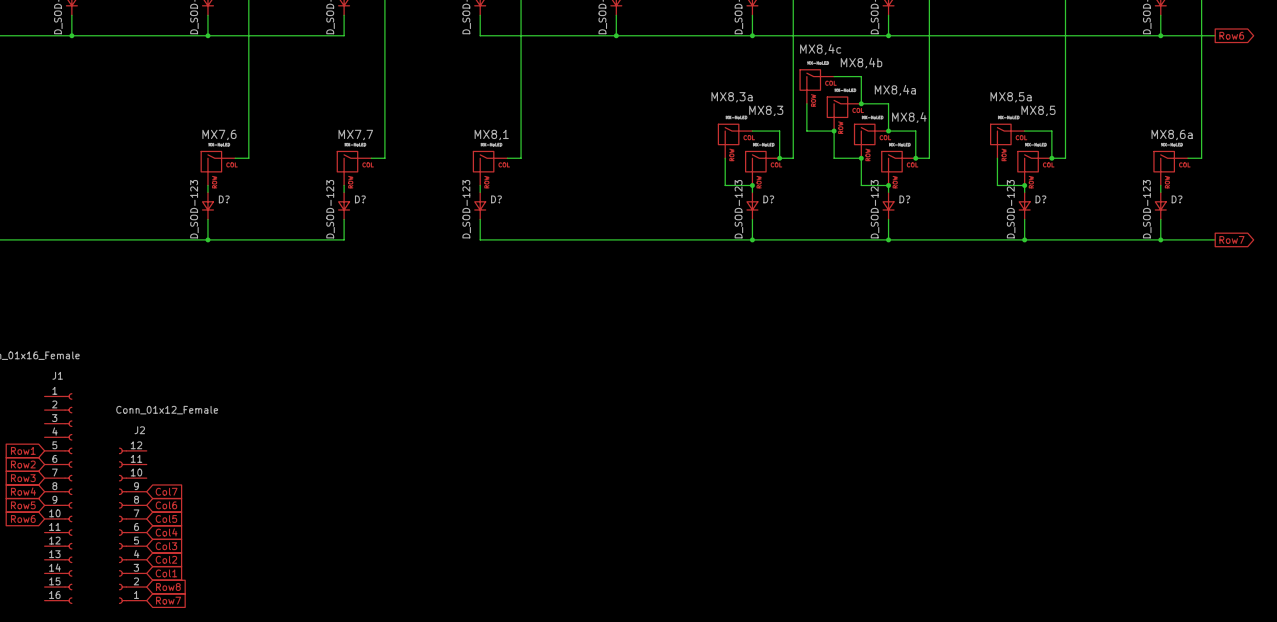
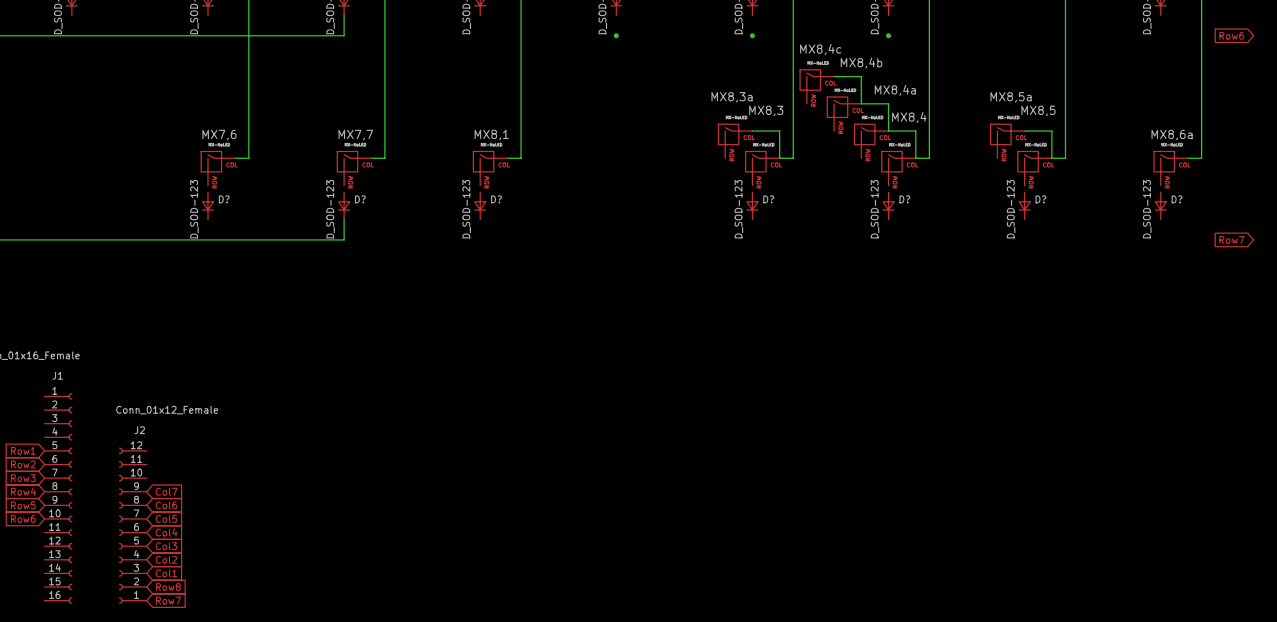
wire: (71, 15) (71, 35) -> none
wire: (207, 15) (207, 35) -> none
wire: (480, 15) (480, 35) (1215, 35) -> none
wire: (616, 15) (616, 35) -> none
wire: (752, 15) (752, 35) -> none
wire: (888, 15) (888, 35) -> none
wire: (1160, 15) (1160, 35) -> none
junction: (71, 35) -> none
junction: (207, 35) -> none
junction: (1160, 35) -> none
wire: (806, 103) (806, 131) (834, 131) (834, 158) (861, 158) (861, 185) (888, 185) (888, 192) -> none
junction: (861, 103) -> none
junction: (834, 131) -> none
junction: (888, 131) -> none
wire: (725, 158) (725, 185) (752, 185) (752, 192) -> none
junction: (779, 158) -> none
junction: (861, 158) -> none
junction: (915, 158) -> none
wire: (997, 158) (997, 185) (1024, 185) (1024, 192) -> none
junction: (1051, 158) -> none
wire: (207, 185) (207, 192) -> none
wire: (344, 185) (344, 192) -> none
wire: (480, 185) (480, 192) -> none
junction: (752, 185) -> none
junction: (888, 185) -> none
junction: (1024, 185) -> none
wire: (1160, 185) (1160, 192) -> none
wire: (207, 219) (207, 239) -> none
wire: (480, 219) (480, 239) (1215, 239) -> none
wire: (752, 219) (752, 239) -> none
wire: (888, 219) (888, 239) -> none
wire: (1024, 219) (1024, 239) -> none
wire: (1160, 219) (1160, 239) -> none
junction: (207, 239) -> none
junction: (752, 239) -> none
junction: (888, 239) -> none
junction: (1024, 239) -> none
junction: (1160, 239) -> none

